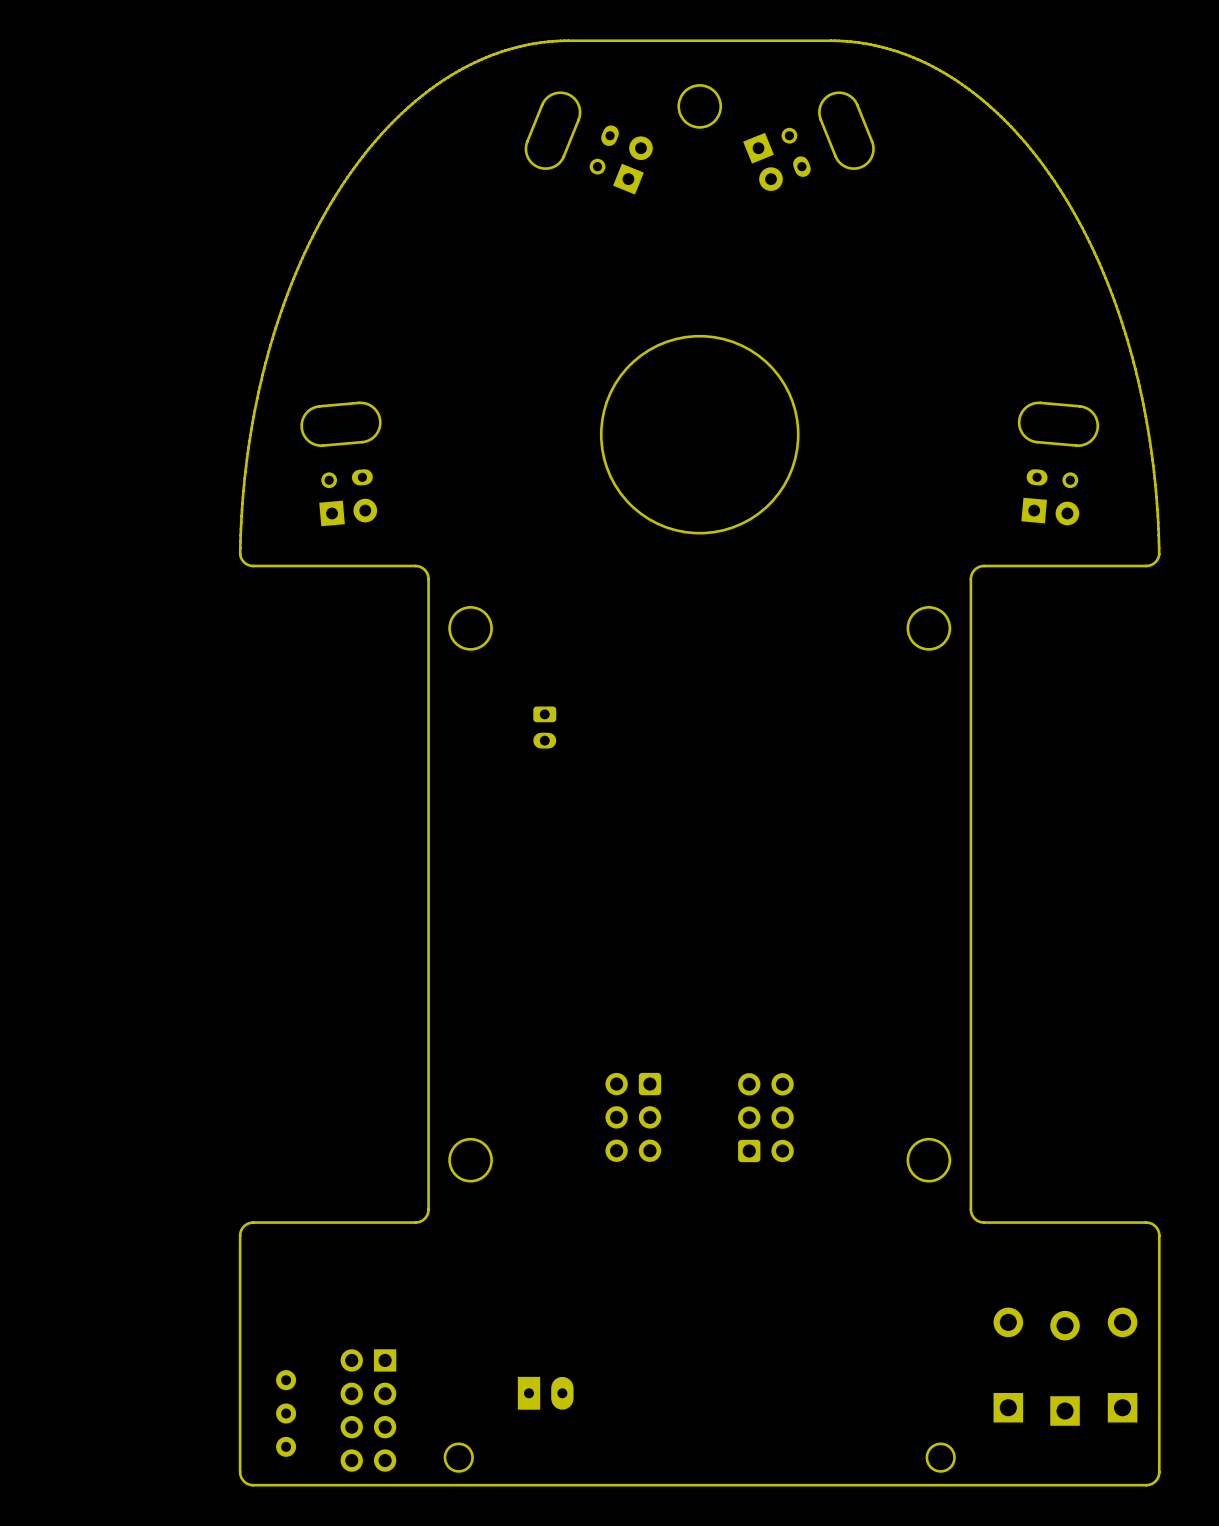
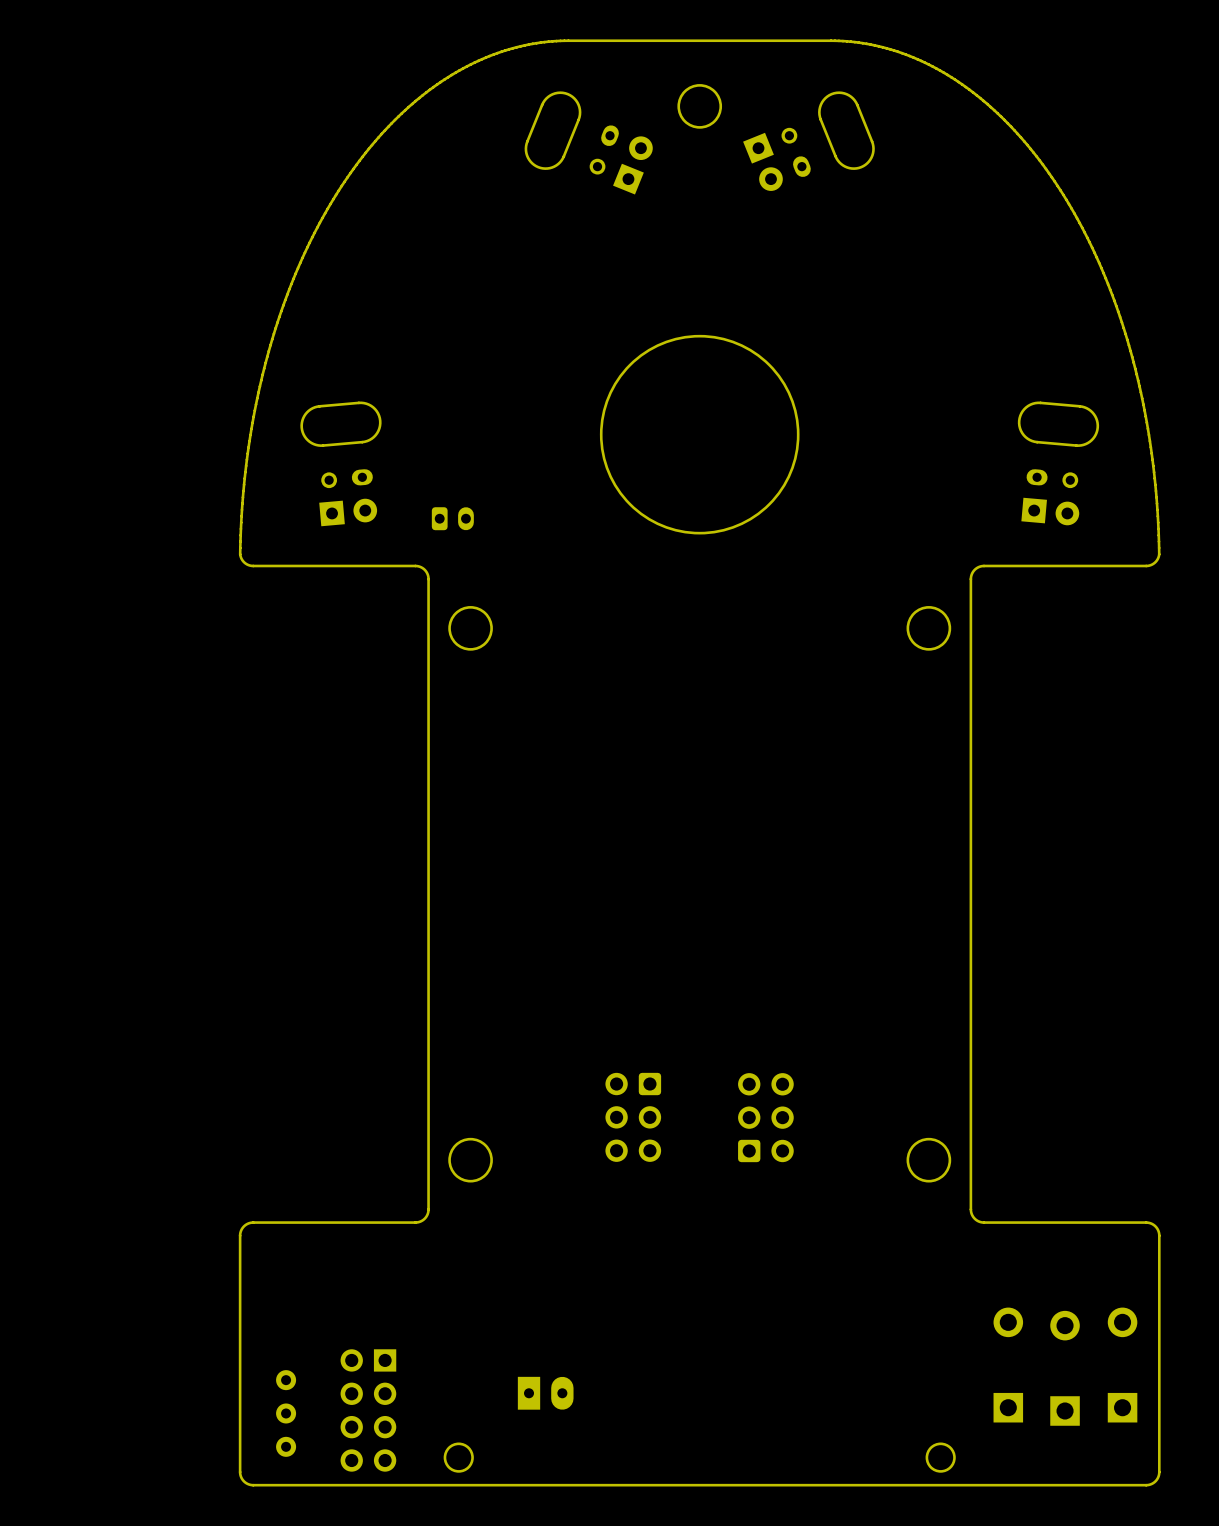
part rotation: 0° (544, 727) -> 90° counterclockwise (452, 518)
part position: (544, 727) -> (452, 518)

